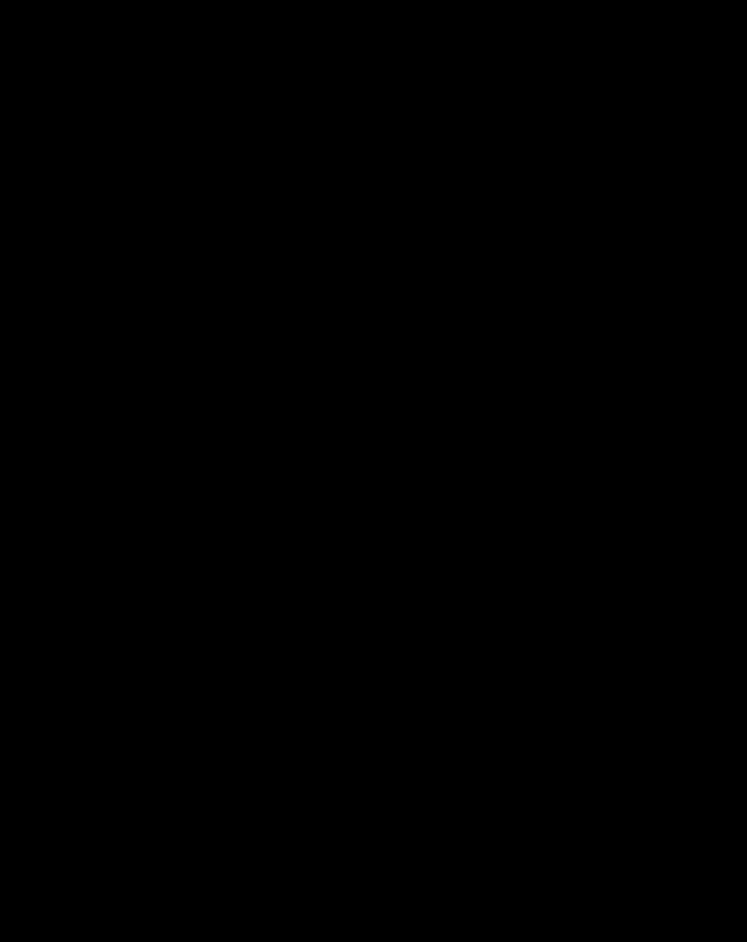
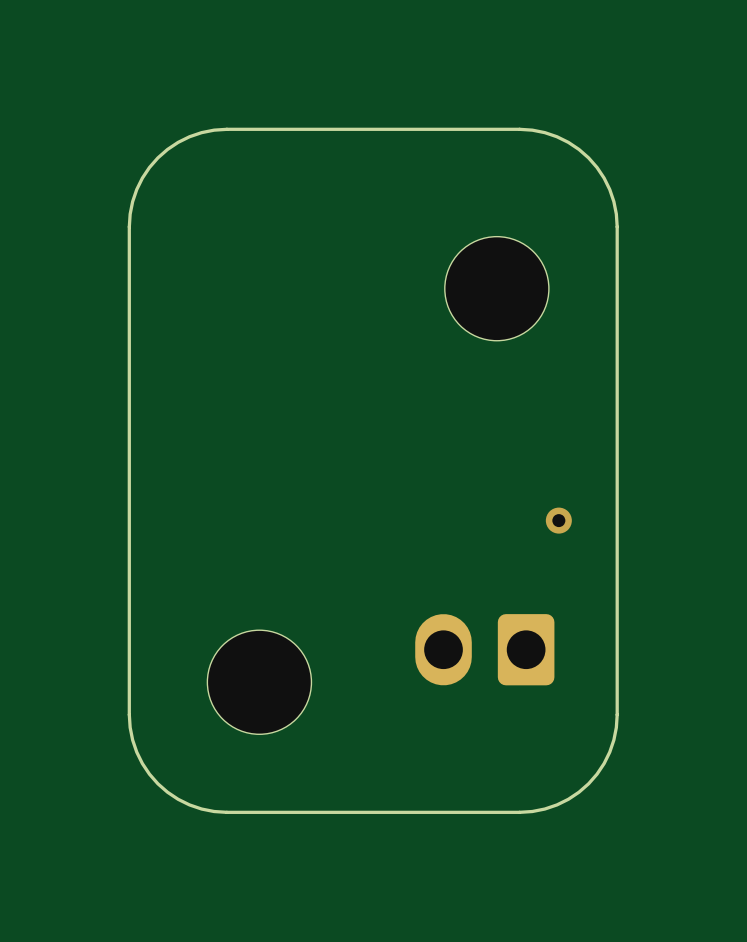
board edge: none -> (519, 129) (214, 130) (189, 136) (167, 149) (149, 167) (142, 178) (132, 201) (129, 226) (129, 714) (132, 740) (142, 763) (157, 783) (178, 799) (201, 809) (226, 812) (532, 811) (556, 804) (579, 792) (597, 774) (604, 763) (613, 740) (617, 714) (616, 214) (609, 189) (604, 178) (588, 157) (568, 142) (556, 136) (544, 132) (519, 129)
part: none -> (496, 288)
via: none -> (558, 520)
part: none -> (484, 649)
part: none -> (259, 682)

